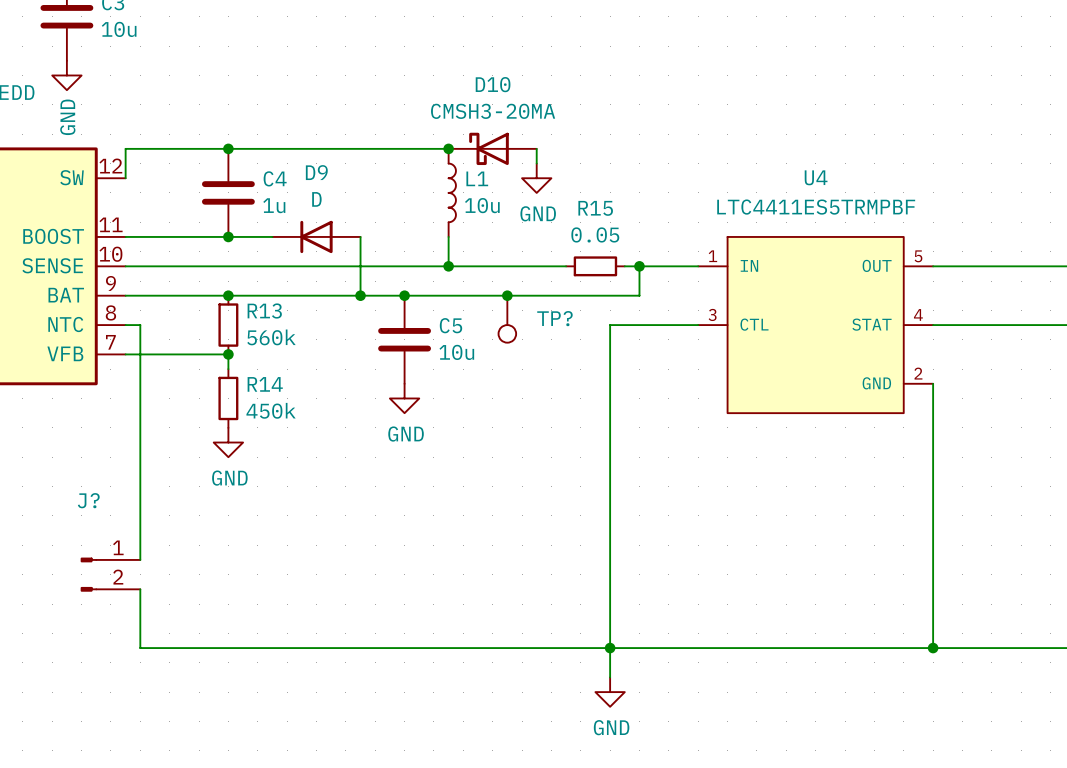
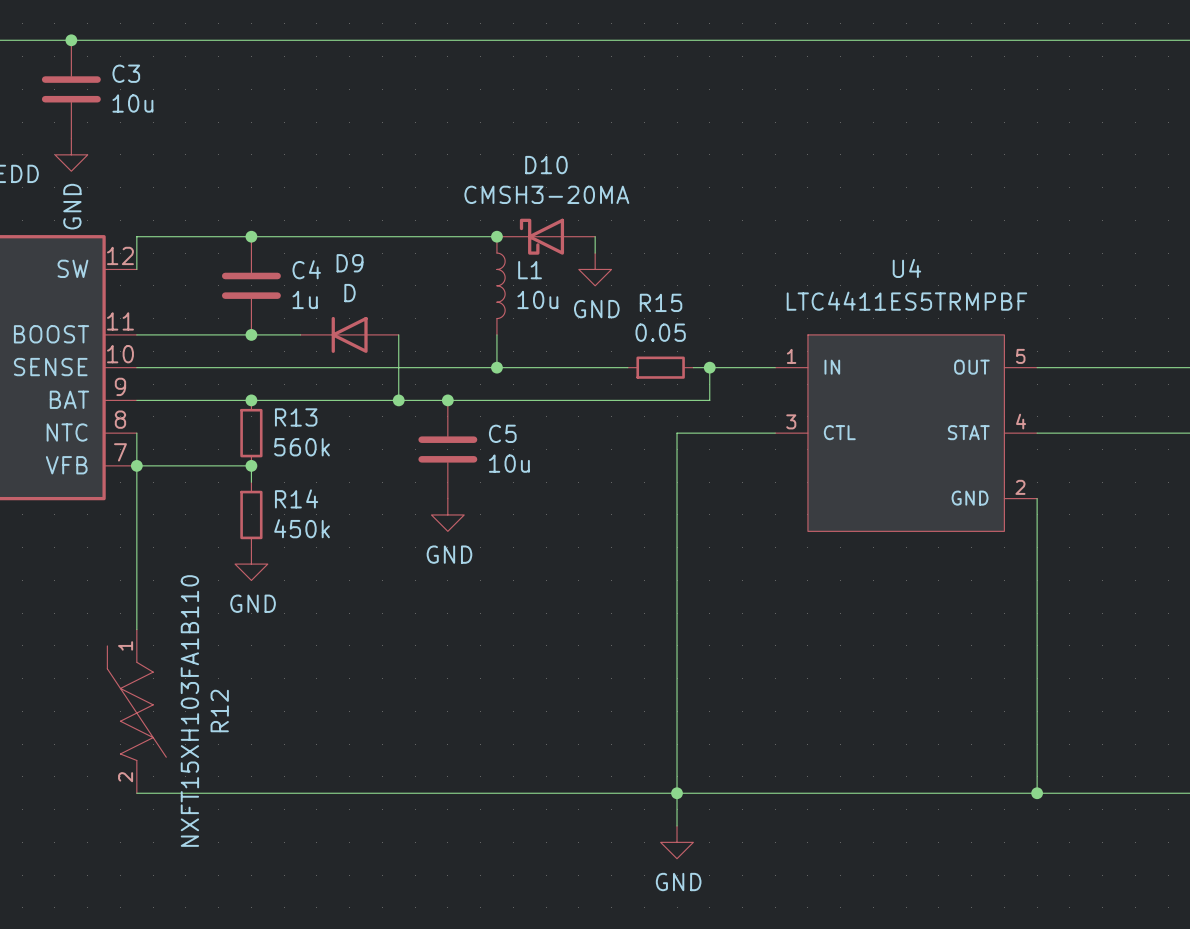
junction: (507, 295) -> none
TP?: (507, 319) -> none
wire: (125, 325) (140, 325) (140, 559) -> (136, 433) (136, 629)
junction: none -> (136, 465)
J?: (110, 574) -> none
R12: none -> NXFT15XH103FA1B110 (136, 711)
wire: (140, 589) (140, 648) -> (136, 793) (153, 793)

